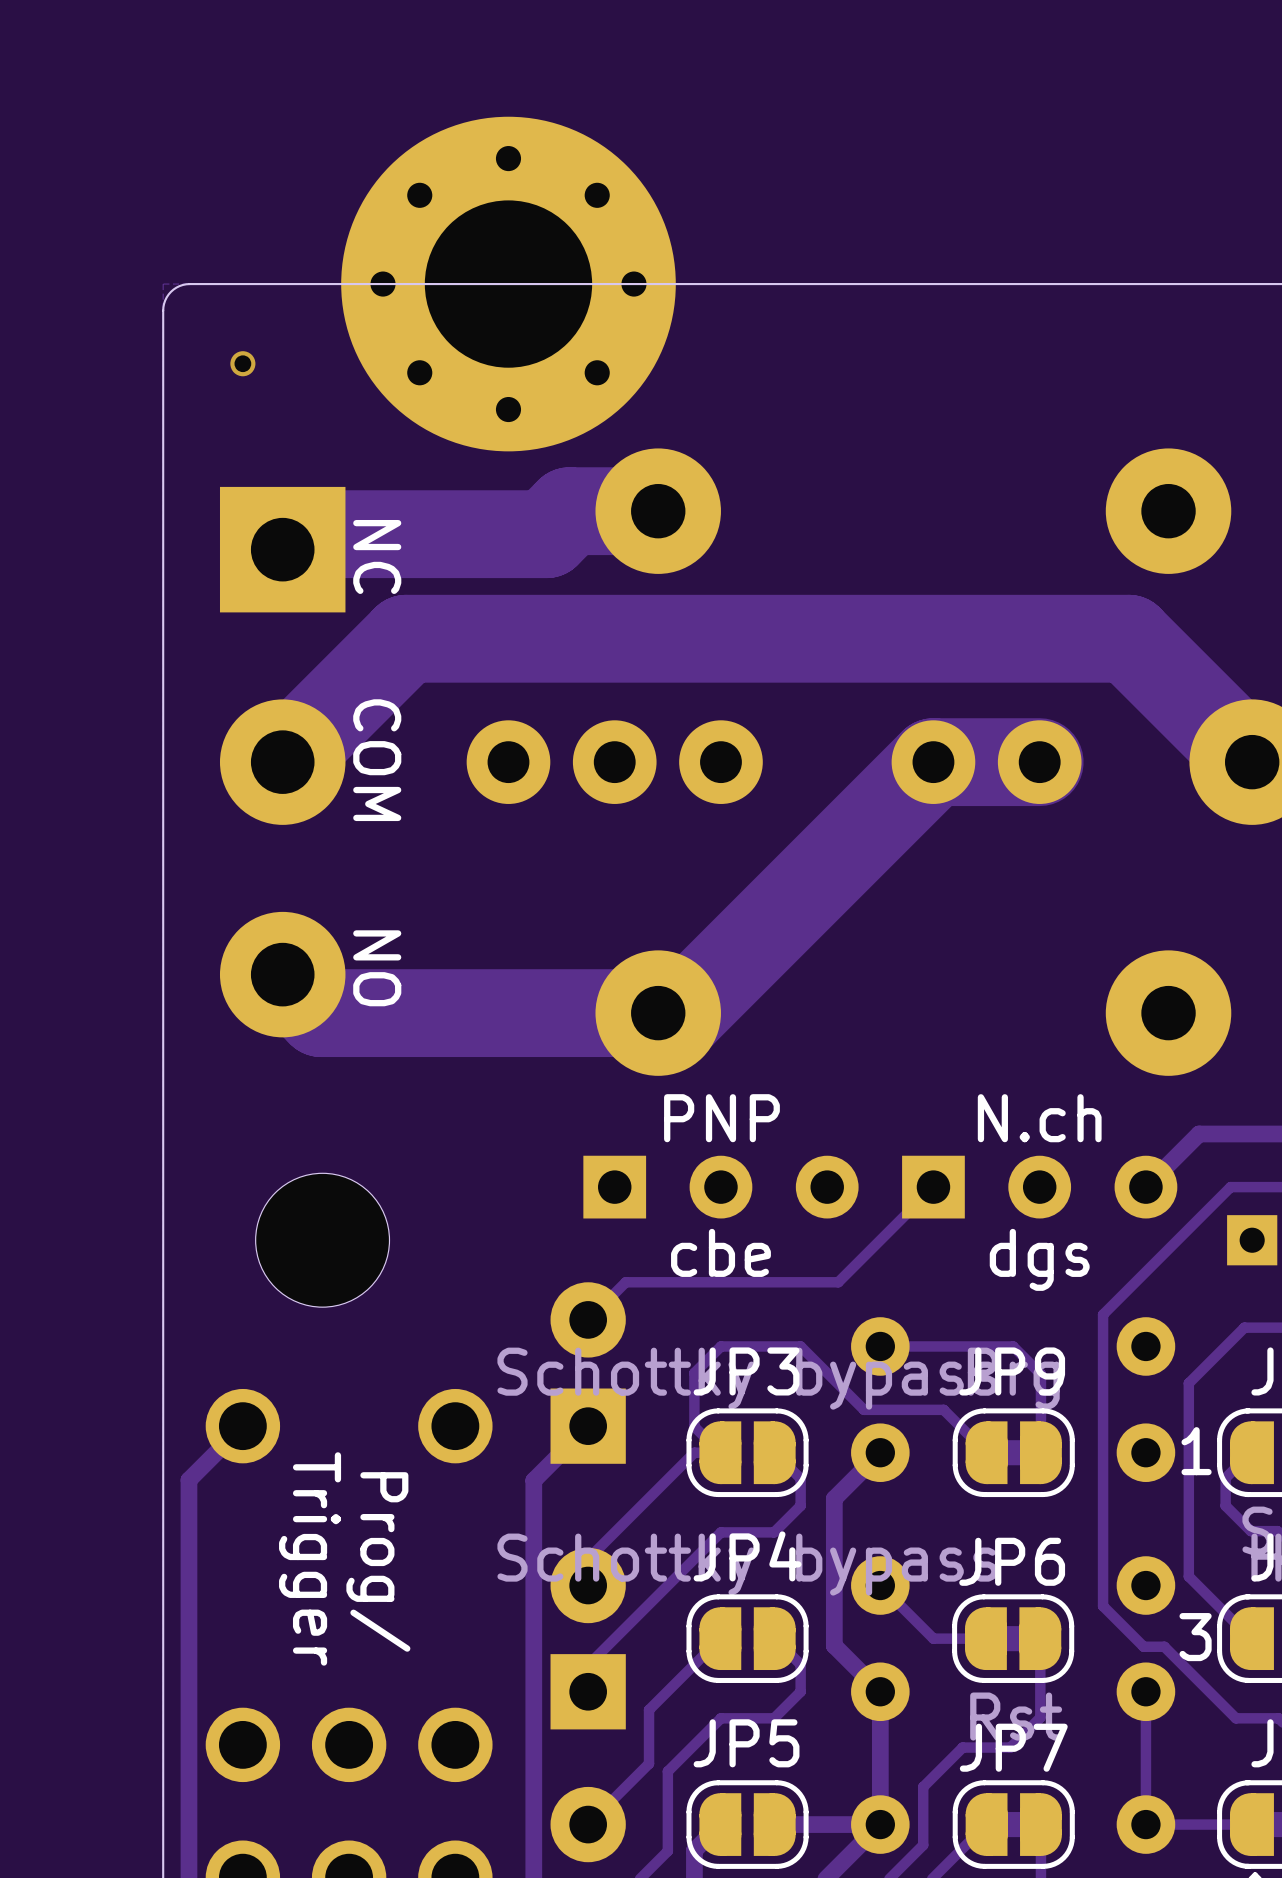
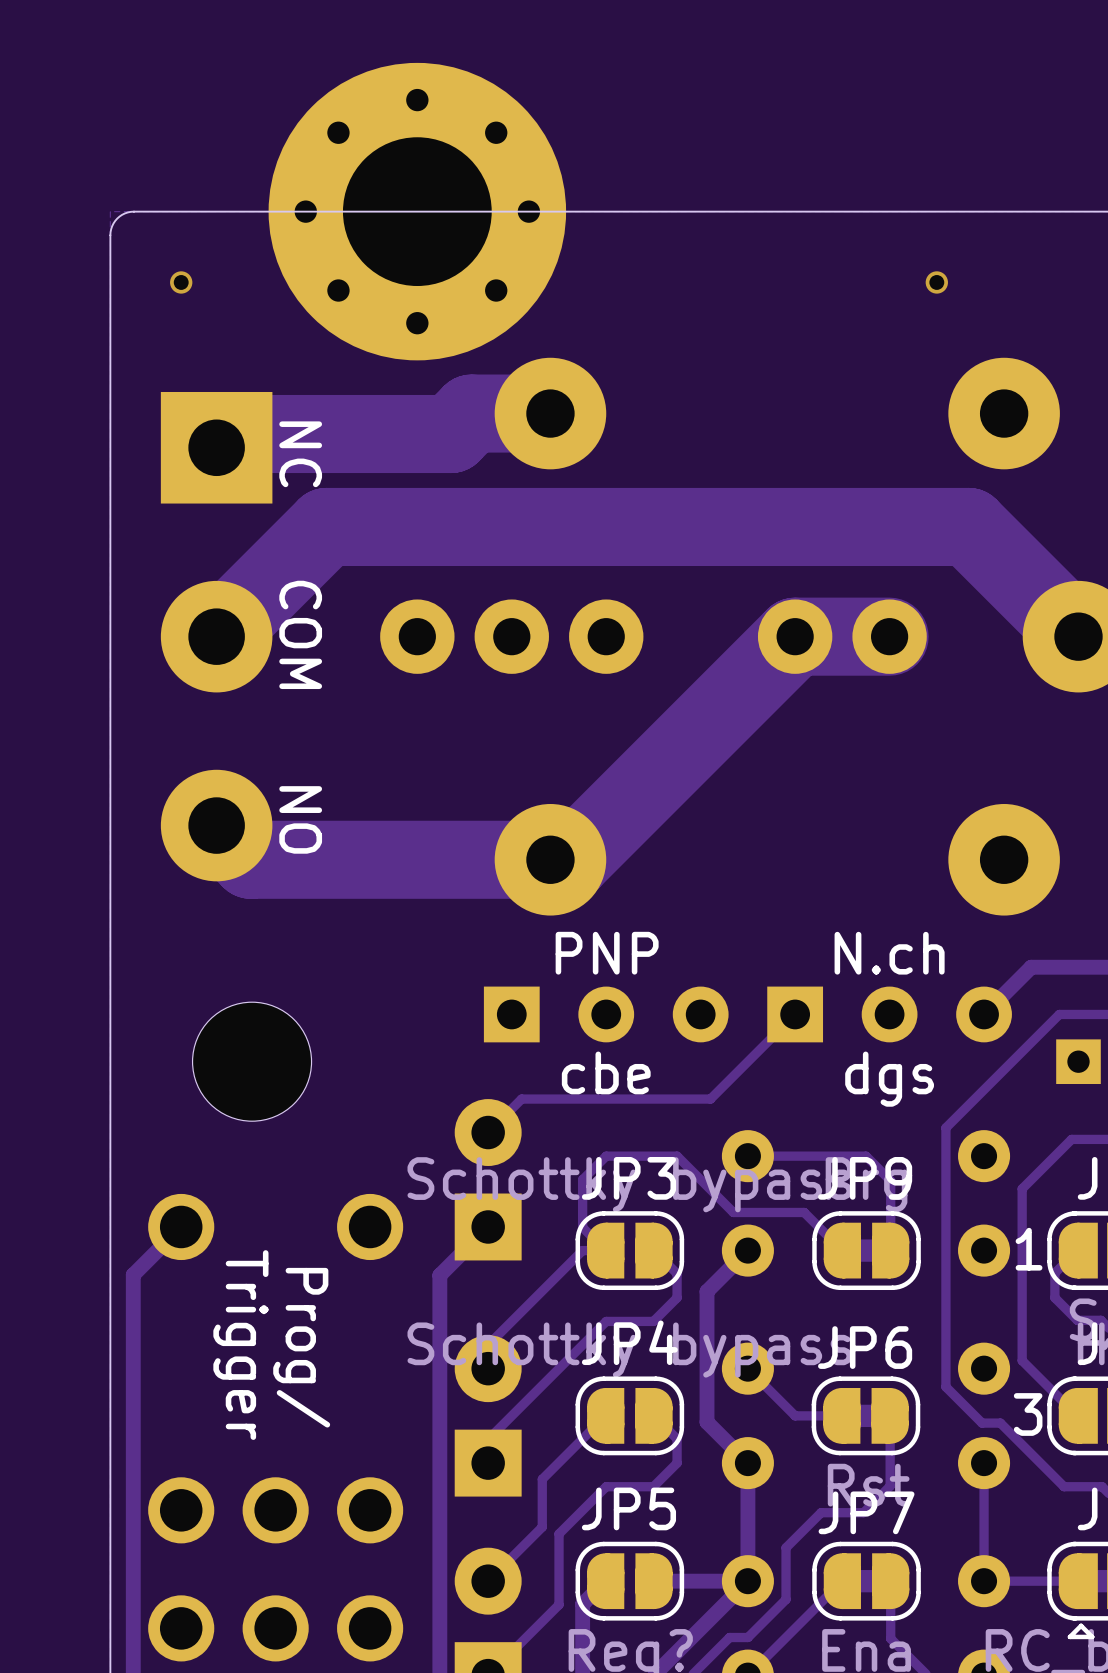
via: none -> (936, 282)

